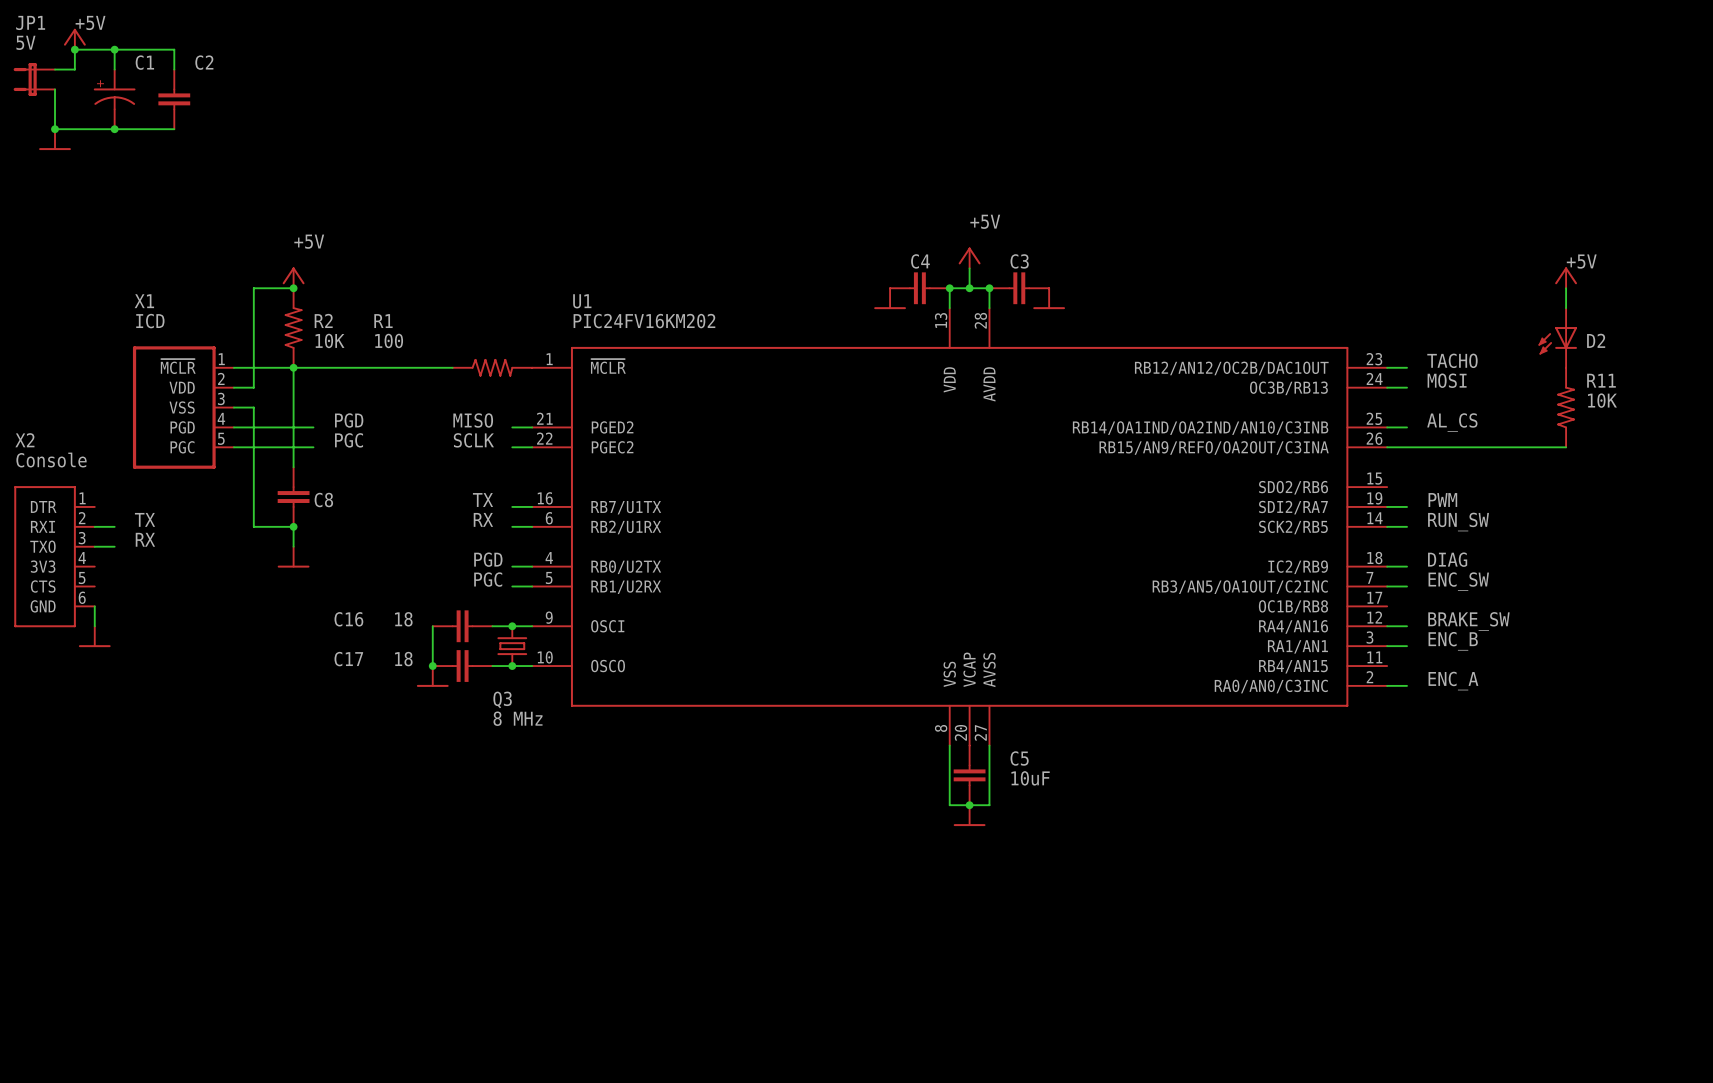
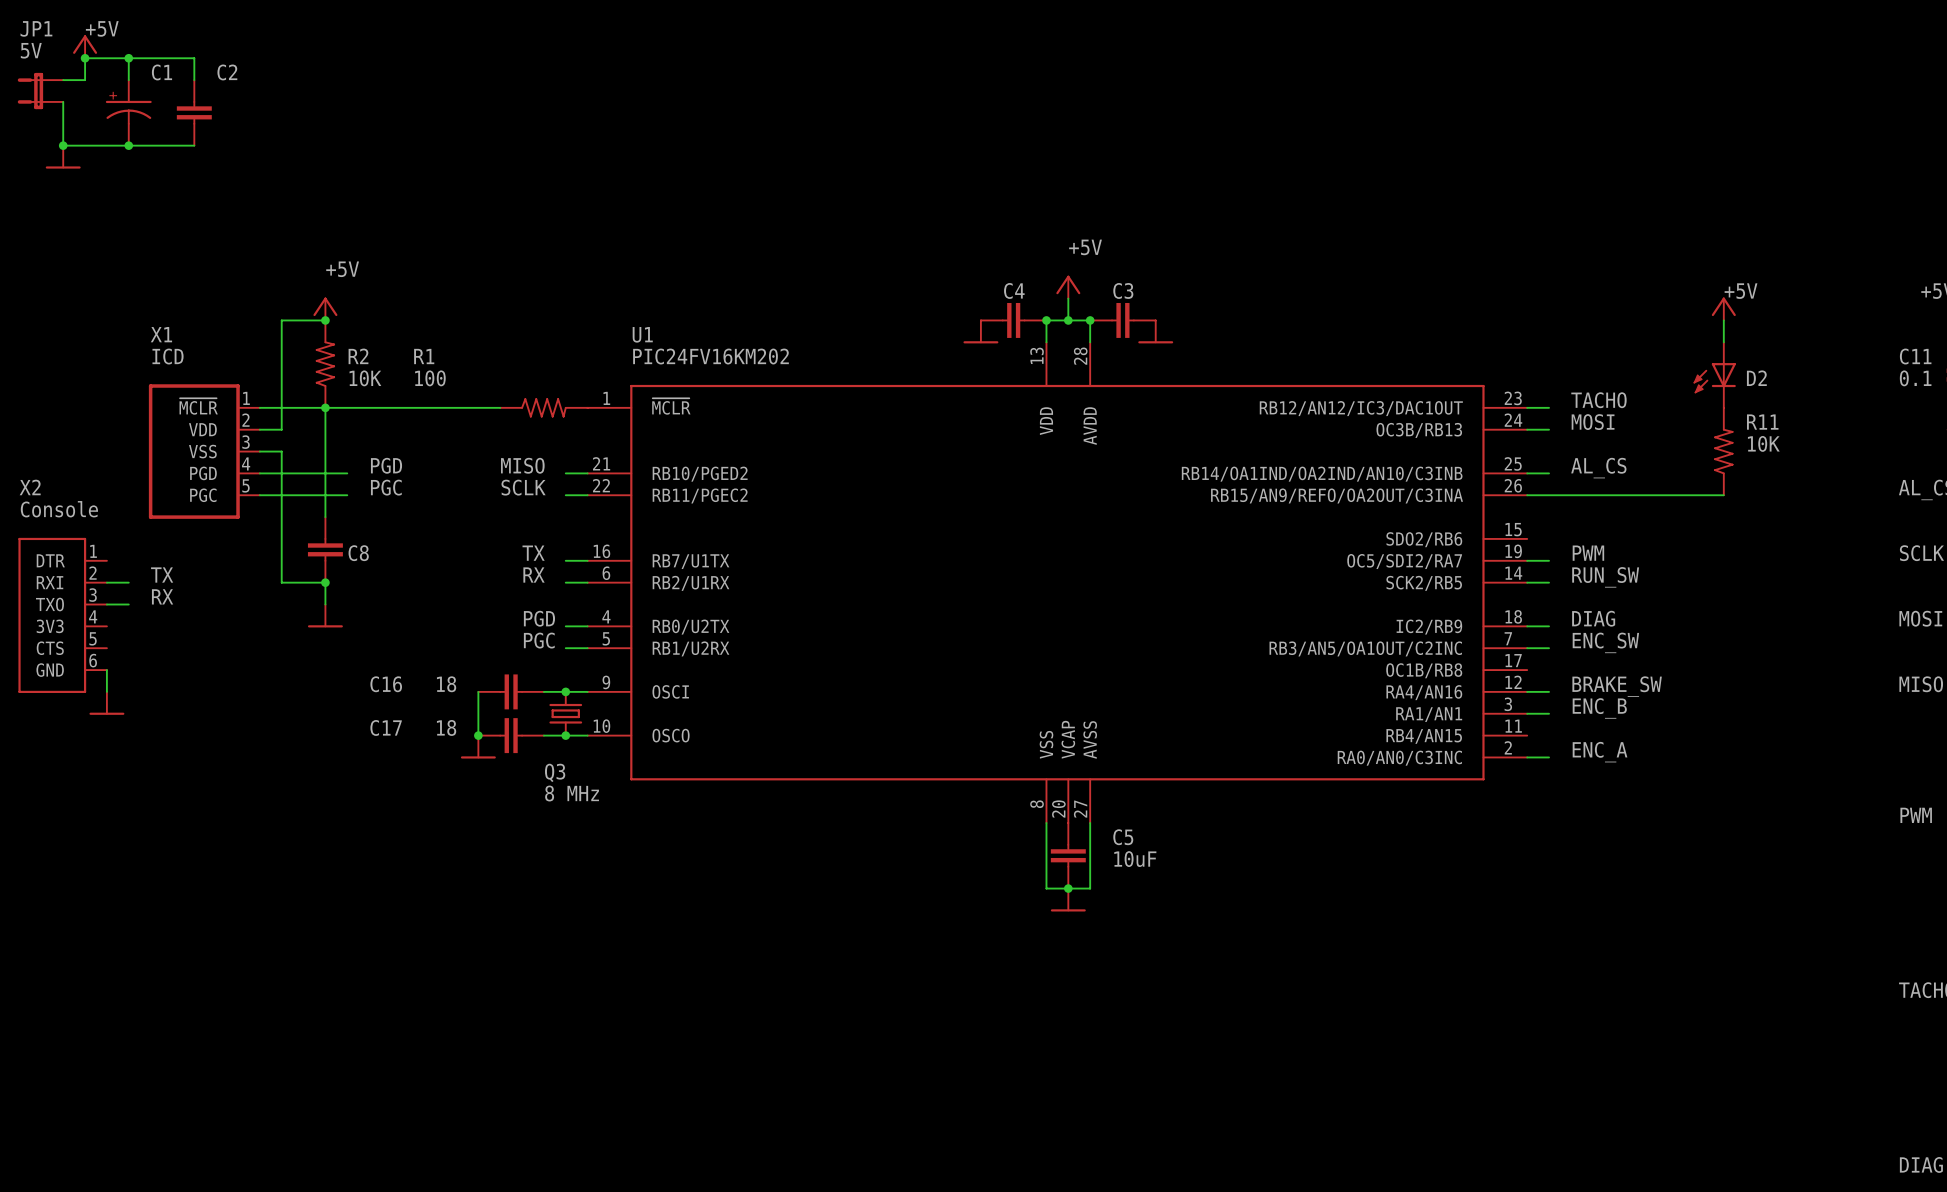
U1 pin name: RB12/AN12/OC2B/DAC1OUT (1231, 368) -> RB12/AN12/IC3/DAC1OUT (1361, 408)
U1 pin name: PGED2 (612, 427) -> RB10/PGED2 (700, 474)
U1 pin name: PGEC2 (612, 447) -> RB11/PGEC2 (700, 495)
U1 pin name: SDI2/RA7 (1293, 507) -> OC5/SDI2/RA7 (1404, 561)

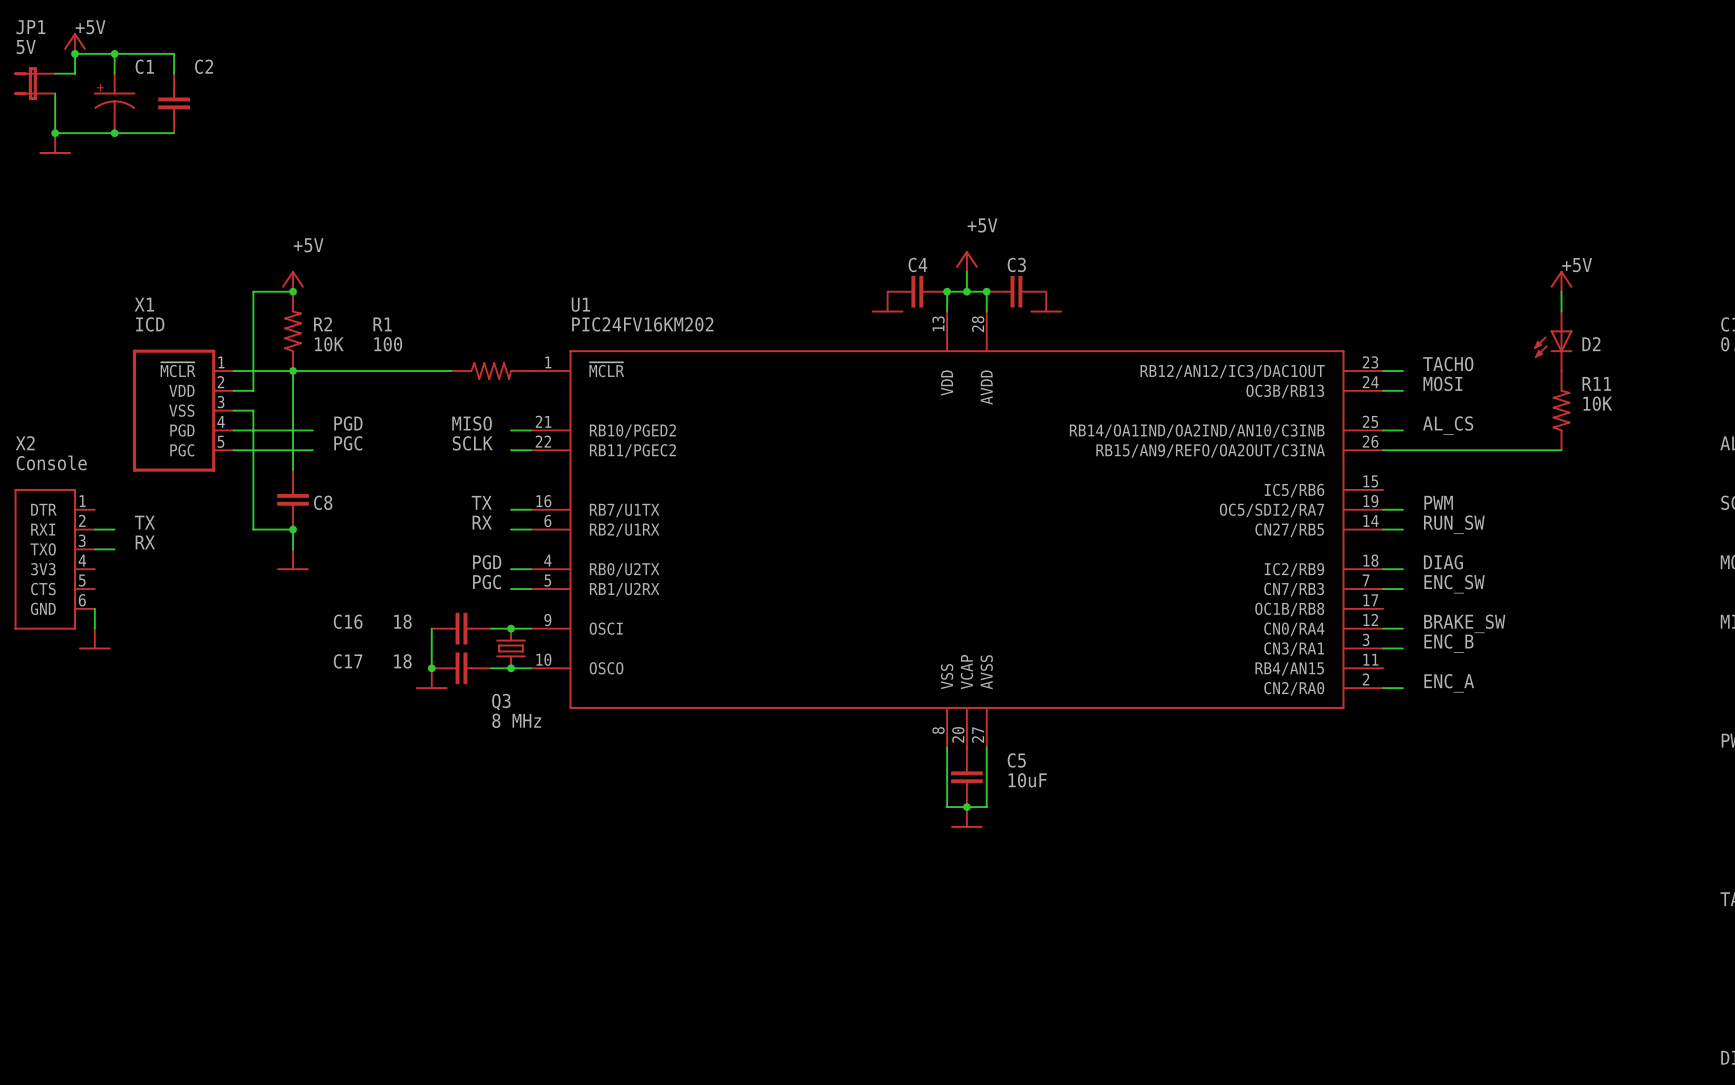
U1 pin name: SDO2/RB6 (1424, 539) -> IC5/RB6 (1294, 490)
U1 pin name: SCK2/RB5 (1424, 583) -> CN27/RB5 (1289, 530)
U1 pin name: RB3/AN5/OA1OUT/C2INC (1365, 648) -> CN7/RB3 (1294, 589)
U1 pin name: RA4/AN16 (1424, 692) -> CN0/RA4 (1294, 629)
U1 pin name: RA1/AN1 (1429, 714) -> CN3/RA1 (1294, 649)
U1 pin name: RA0/AN0/C3INC (1399, 758) -> CN2/RA0 (1294, 688)

